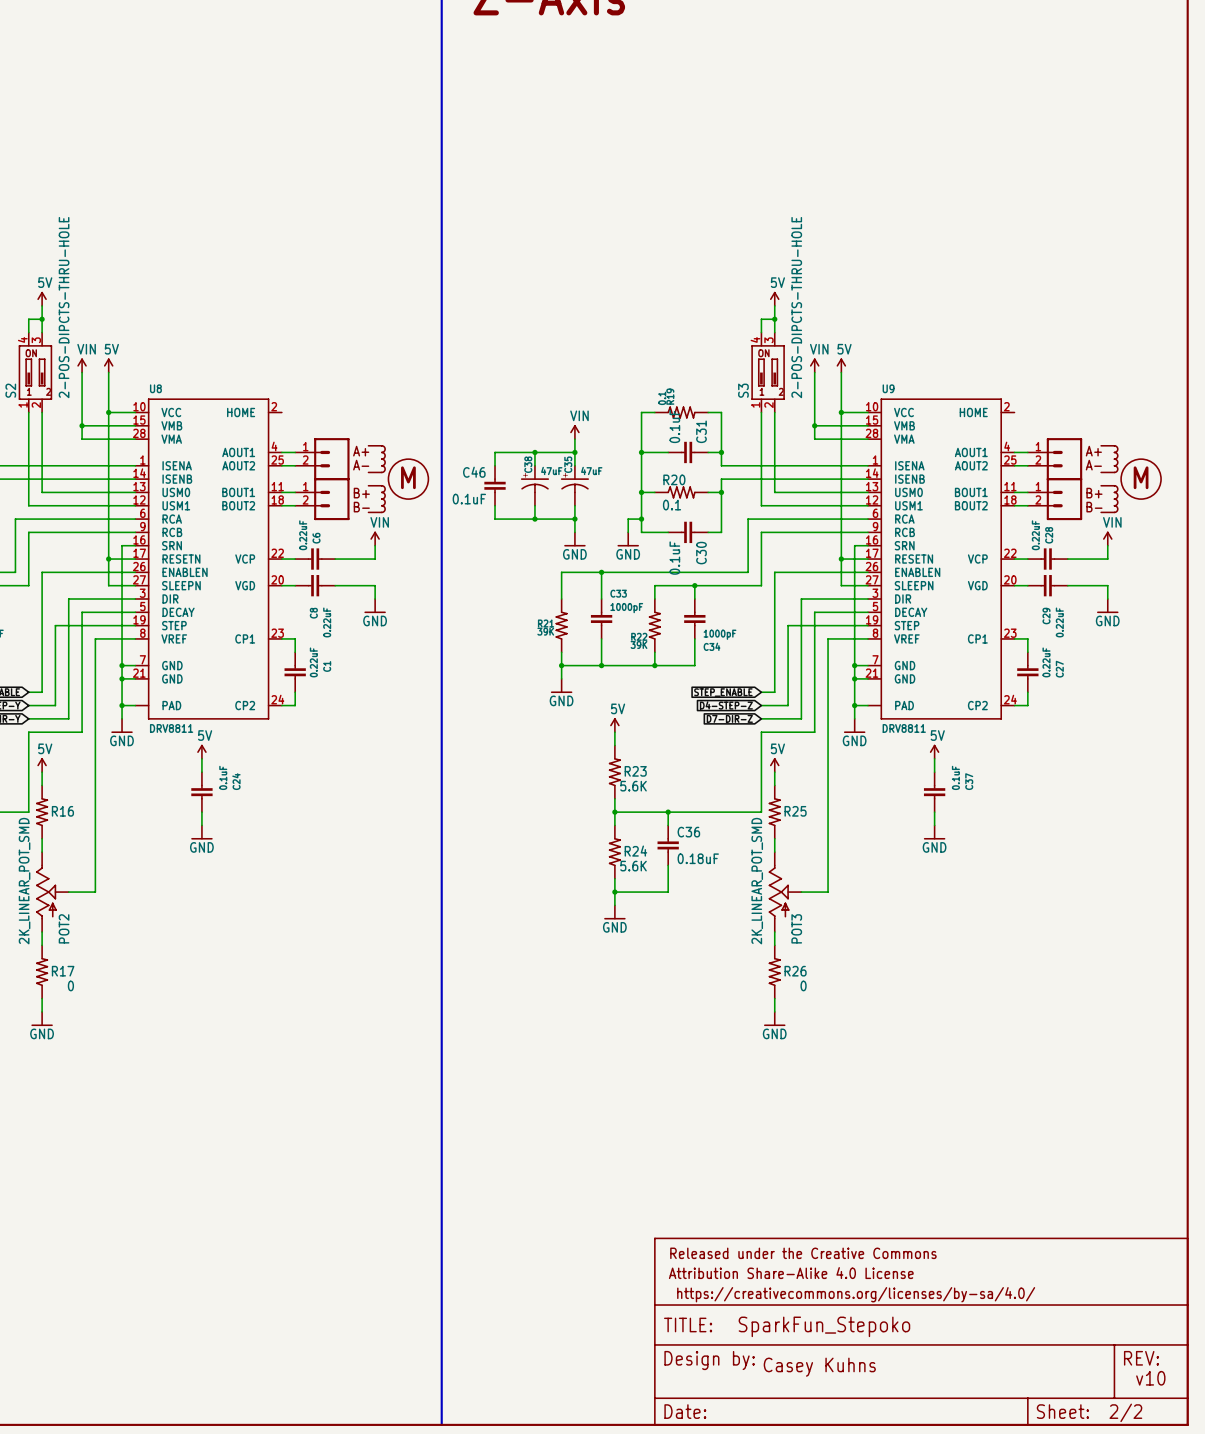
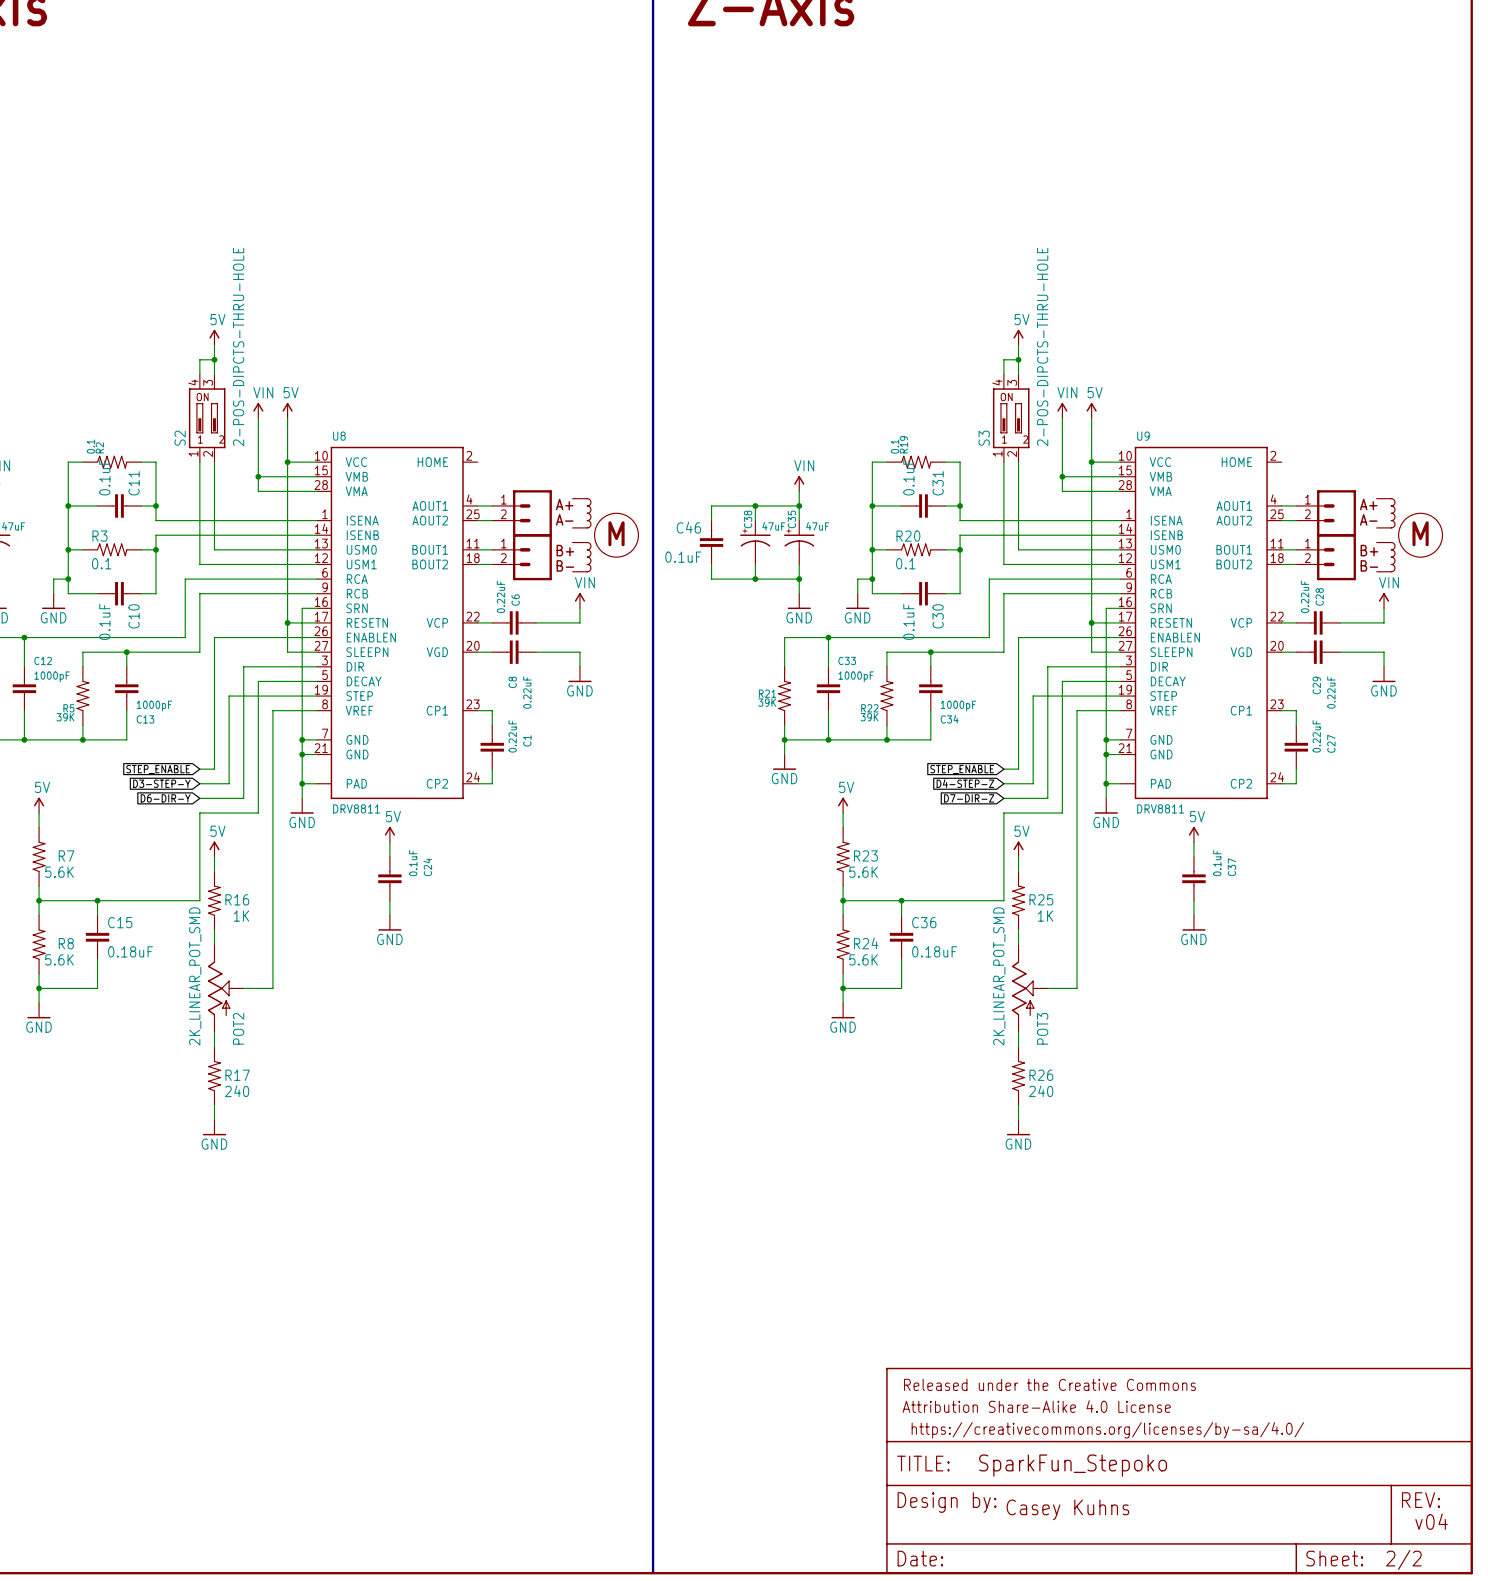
R16 value: none -> 1K (241, 916)
R25 value: none -> 1K (1045, 916)
R17 value: 0 (70, 985) -> 240 (237, 1091)
R26 value: 0 (803, 985) -> 240 (1041, 1091)
text: v10 (1150, 1378) -> v04 (1431, 1521)

